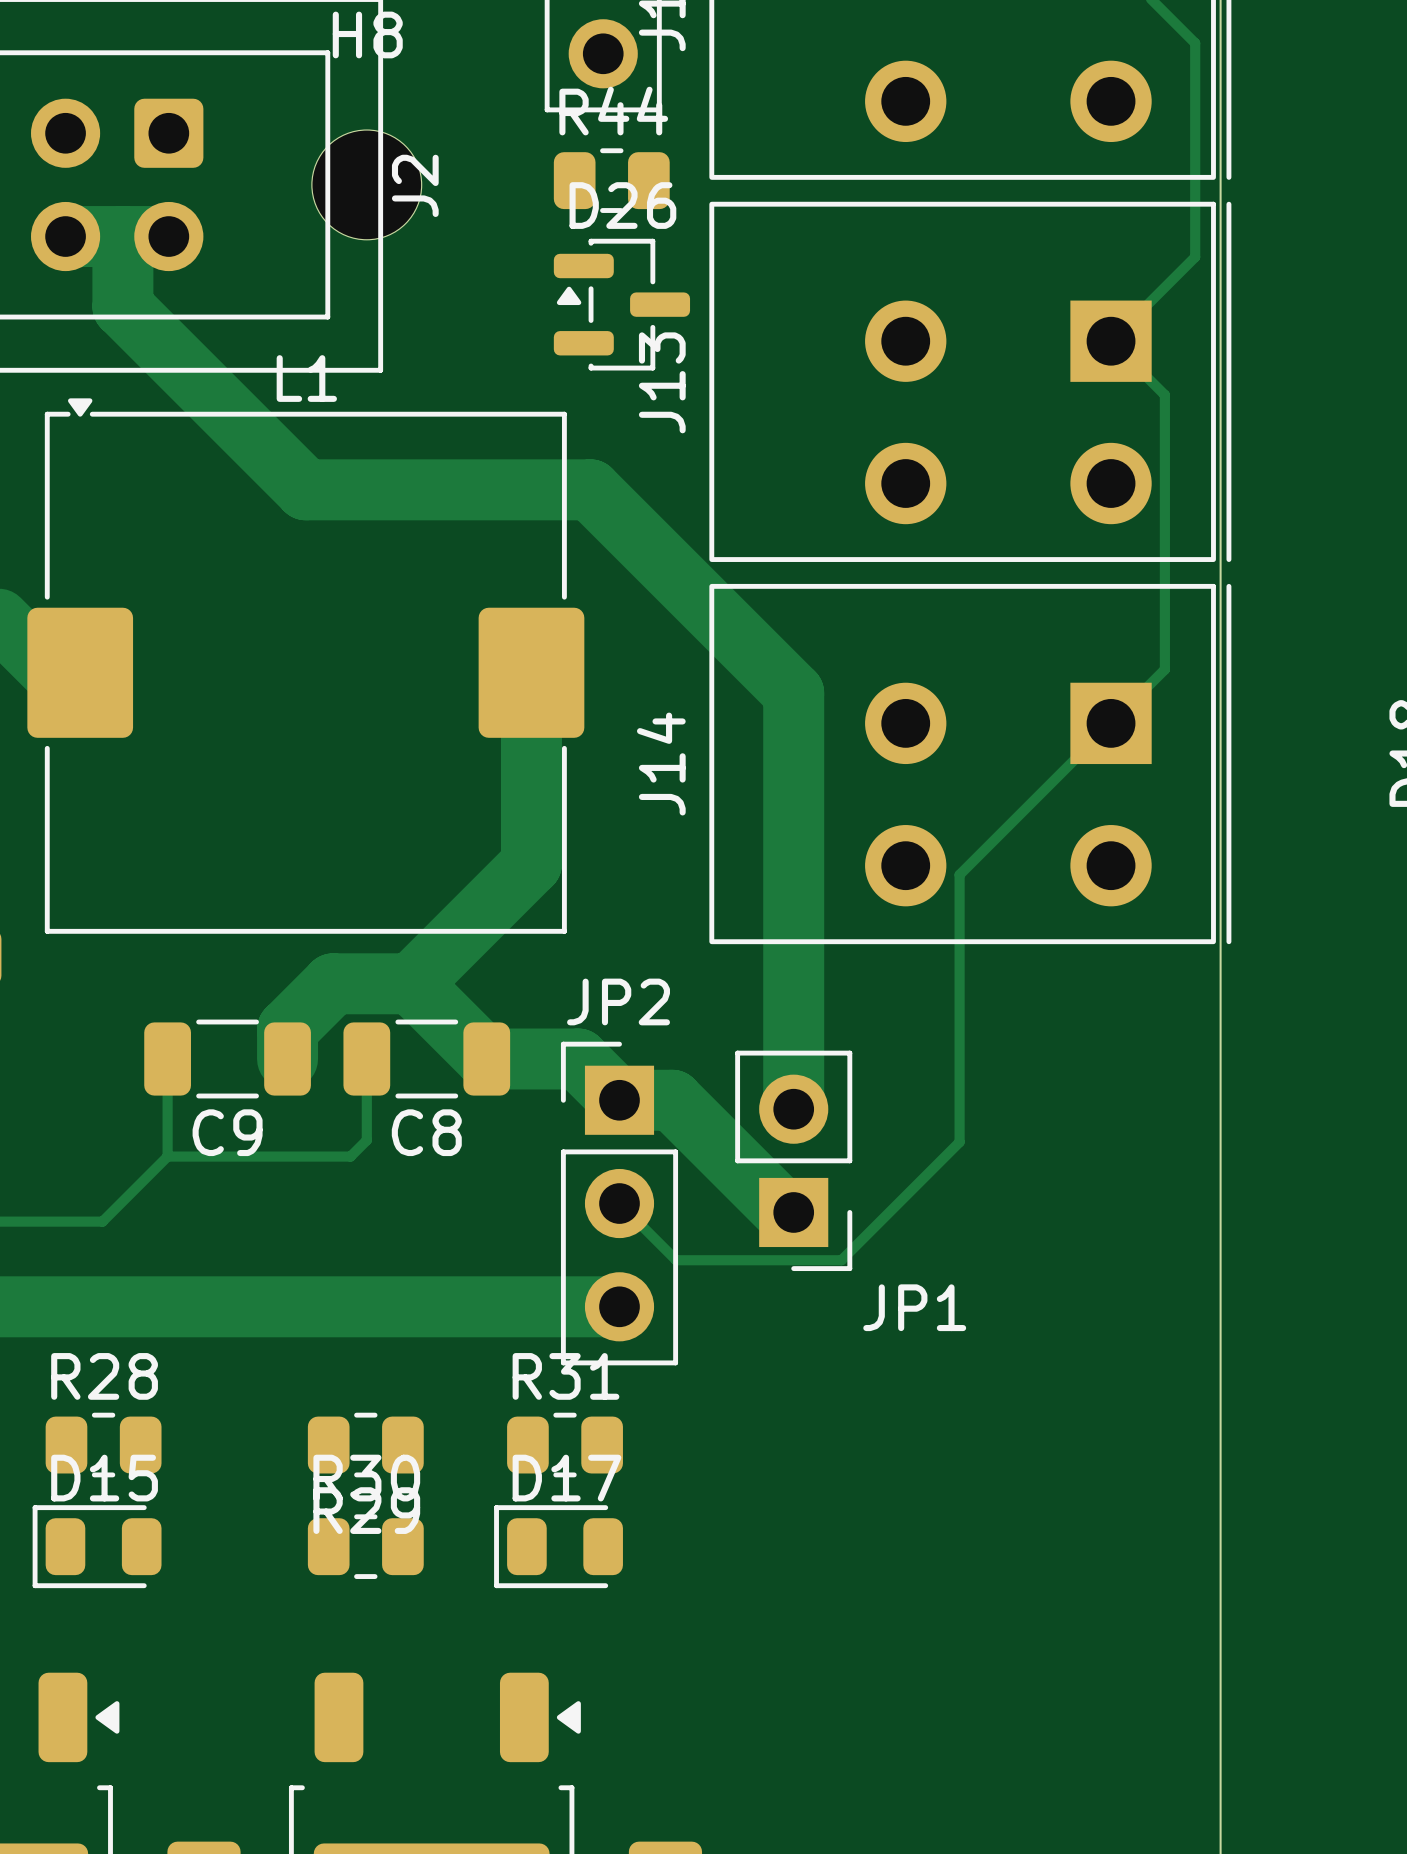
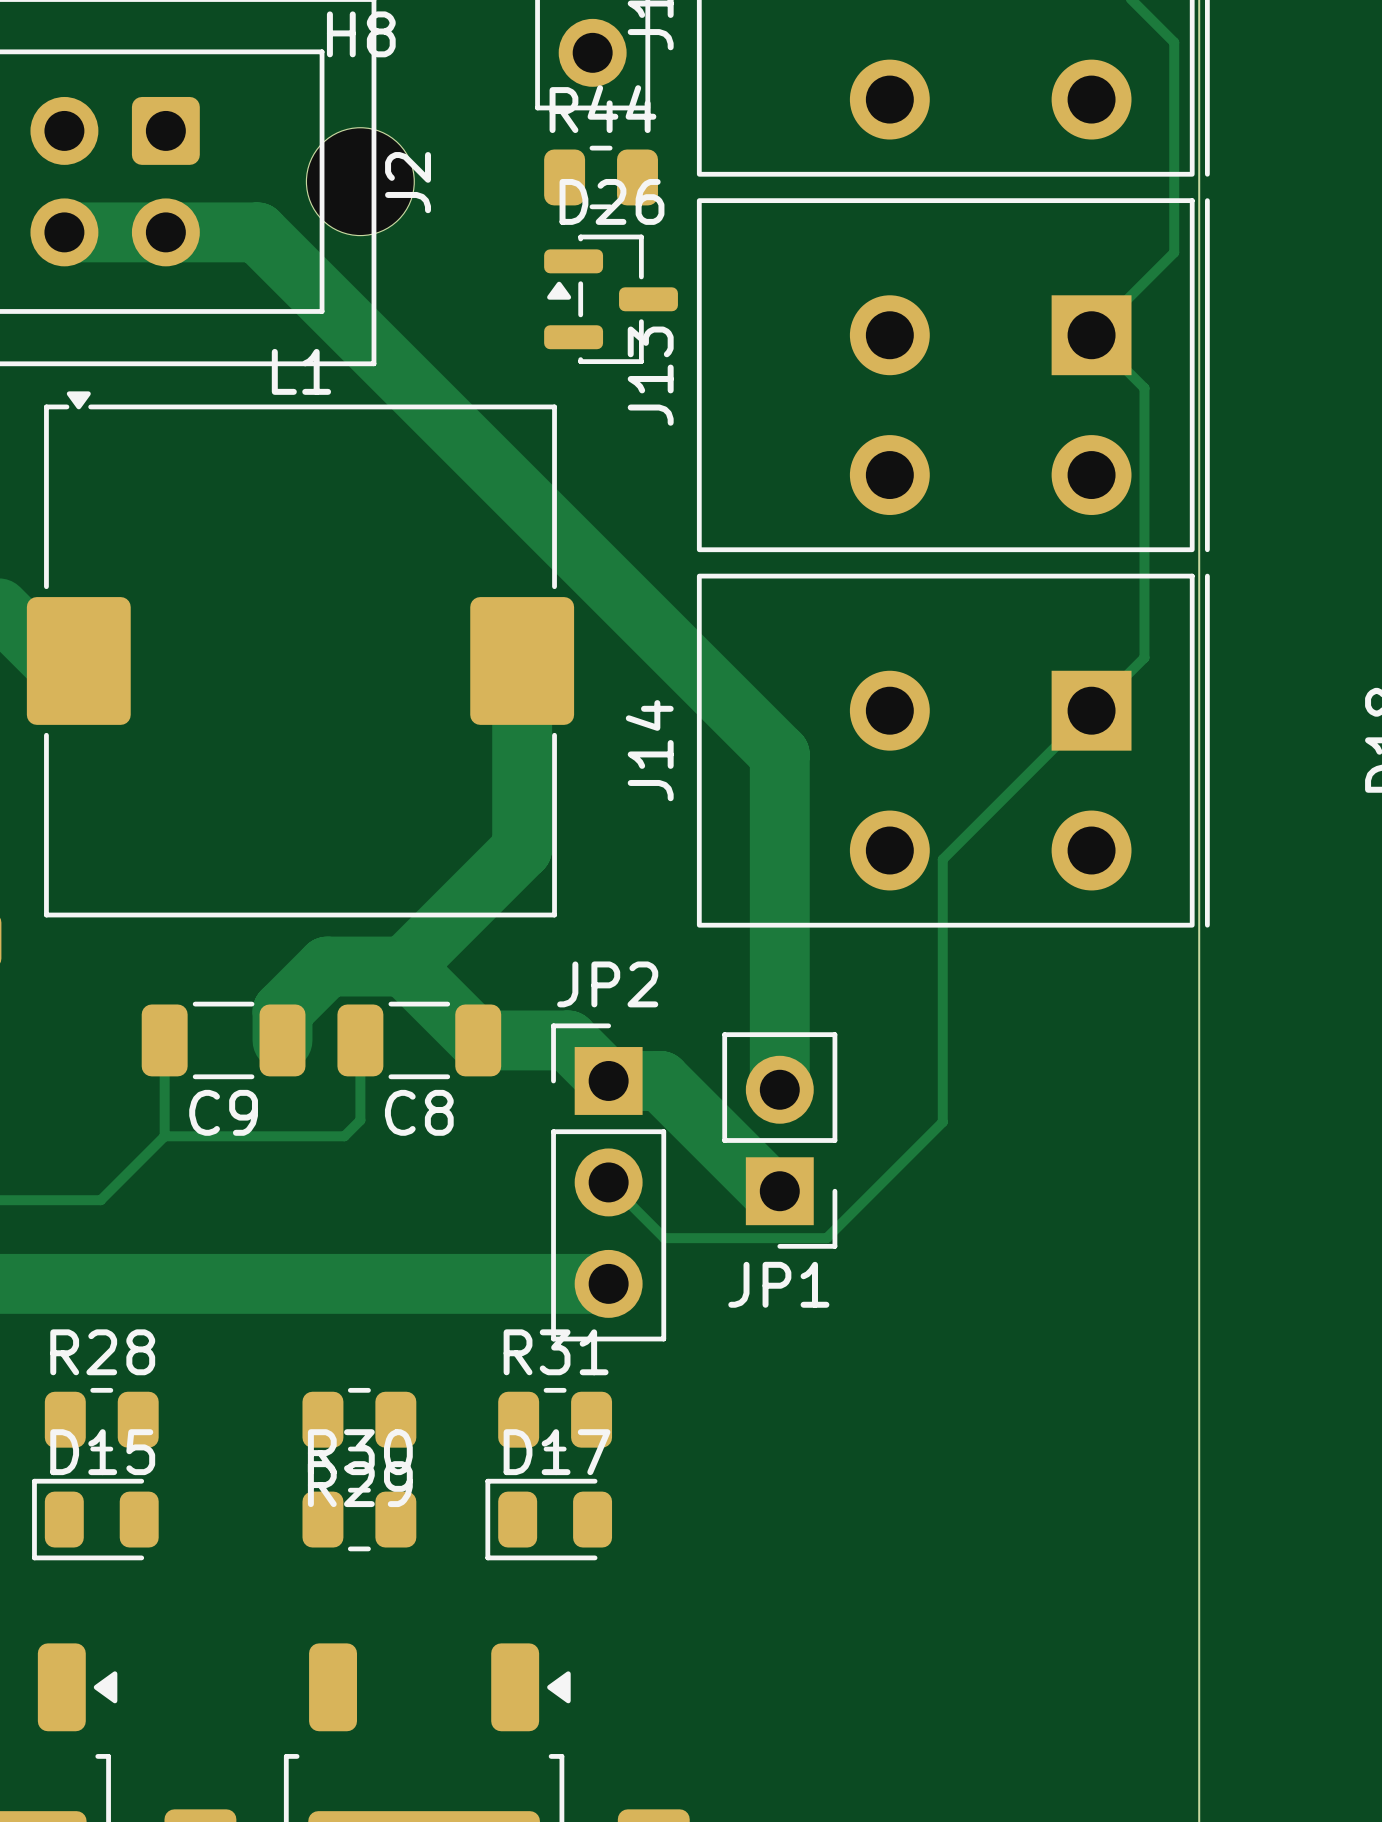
track: (122, 236) (122, 306) (305, 489) (590, 489) (793, 693) (793, 768) -> (165, 232) (257, 232) (779, 754)
JP1 name position: JP1 (914, 1307) -> JP1 (778, 1284)

